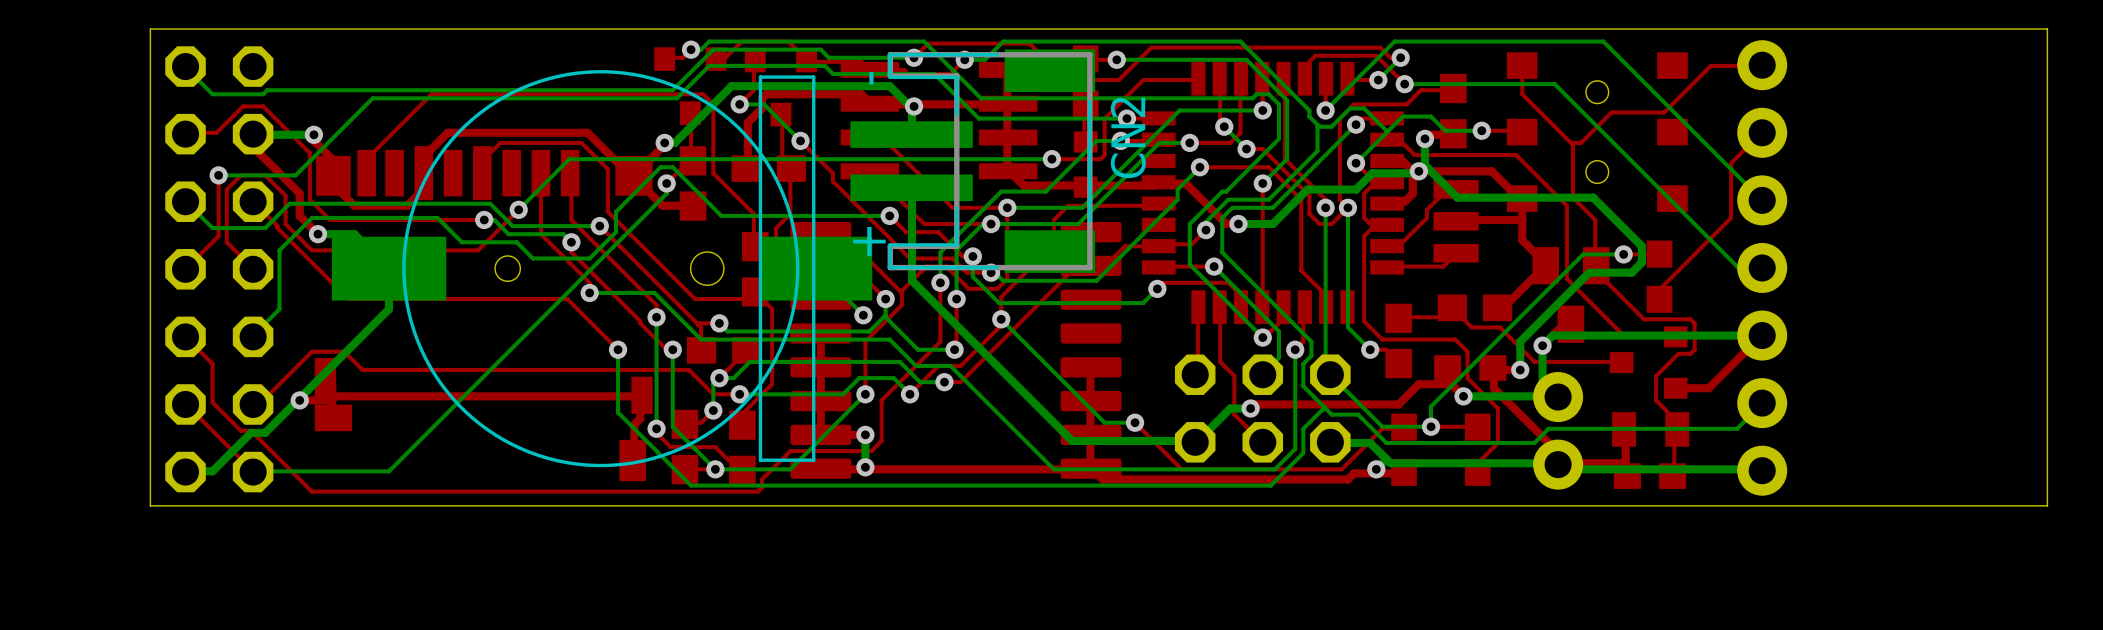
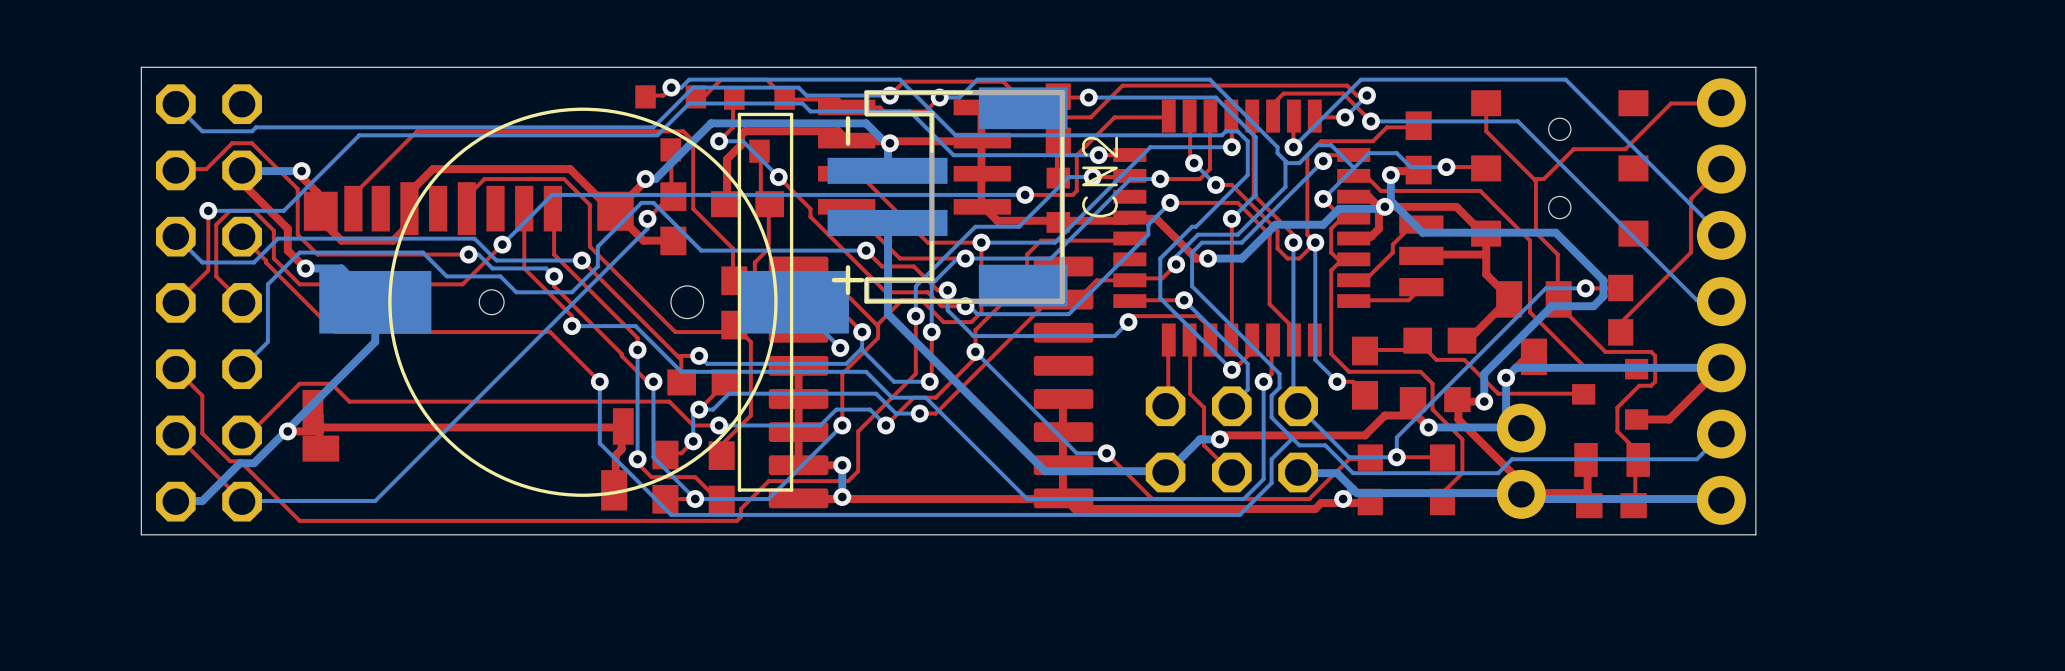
board edge: (1797, 28) (2047, 28) (2047, 505) (1797, 505) -> (1755, 67) (1755, 534)

